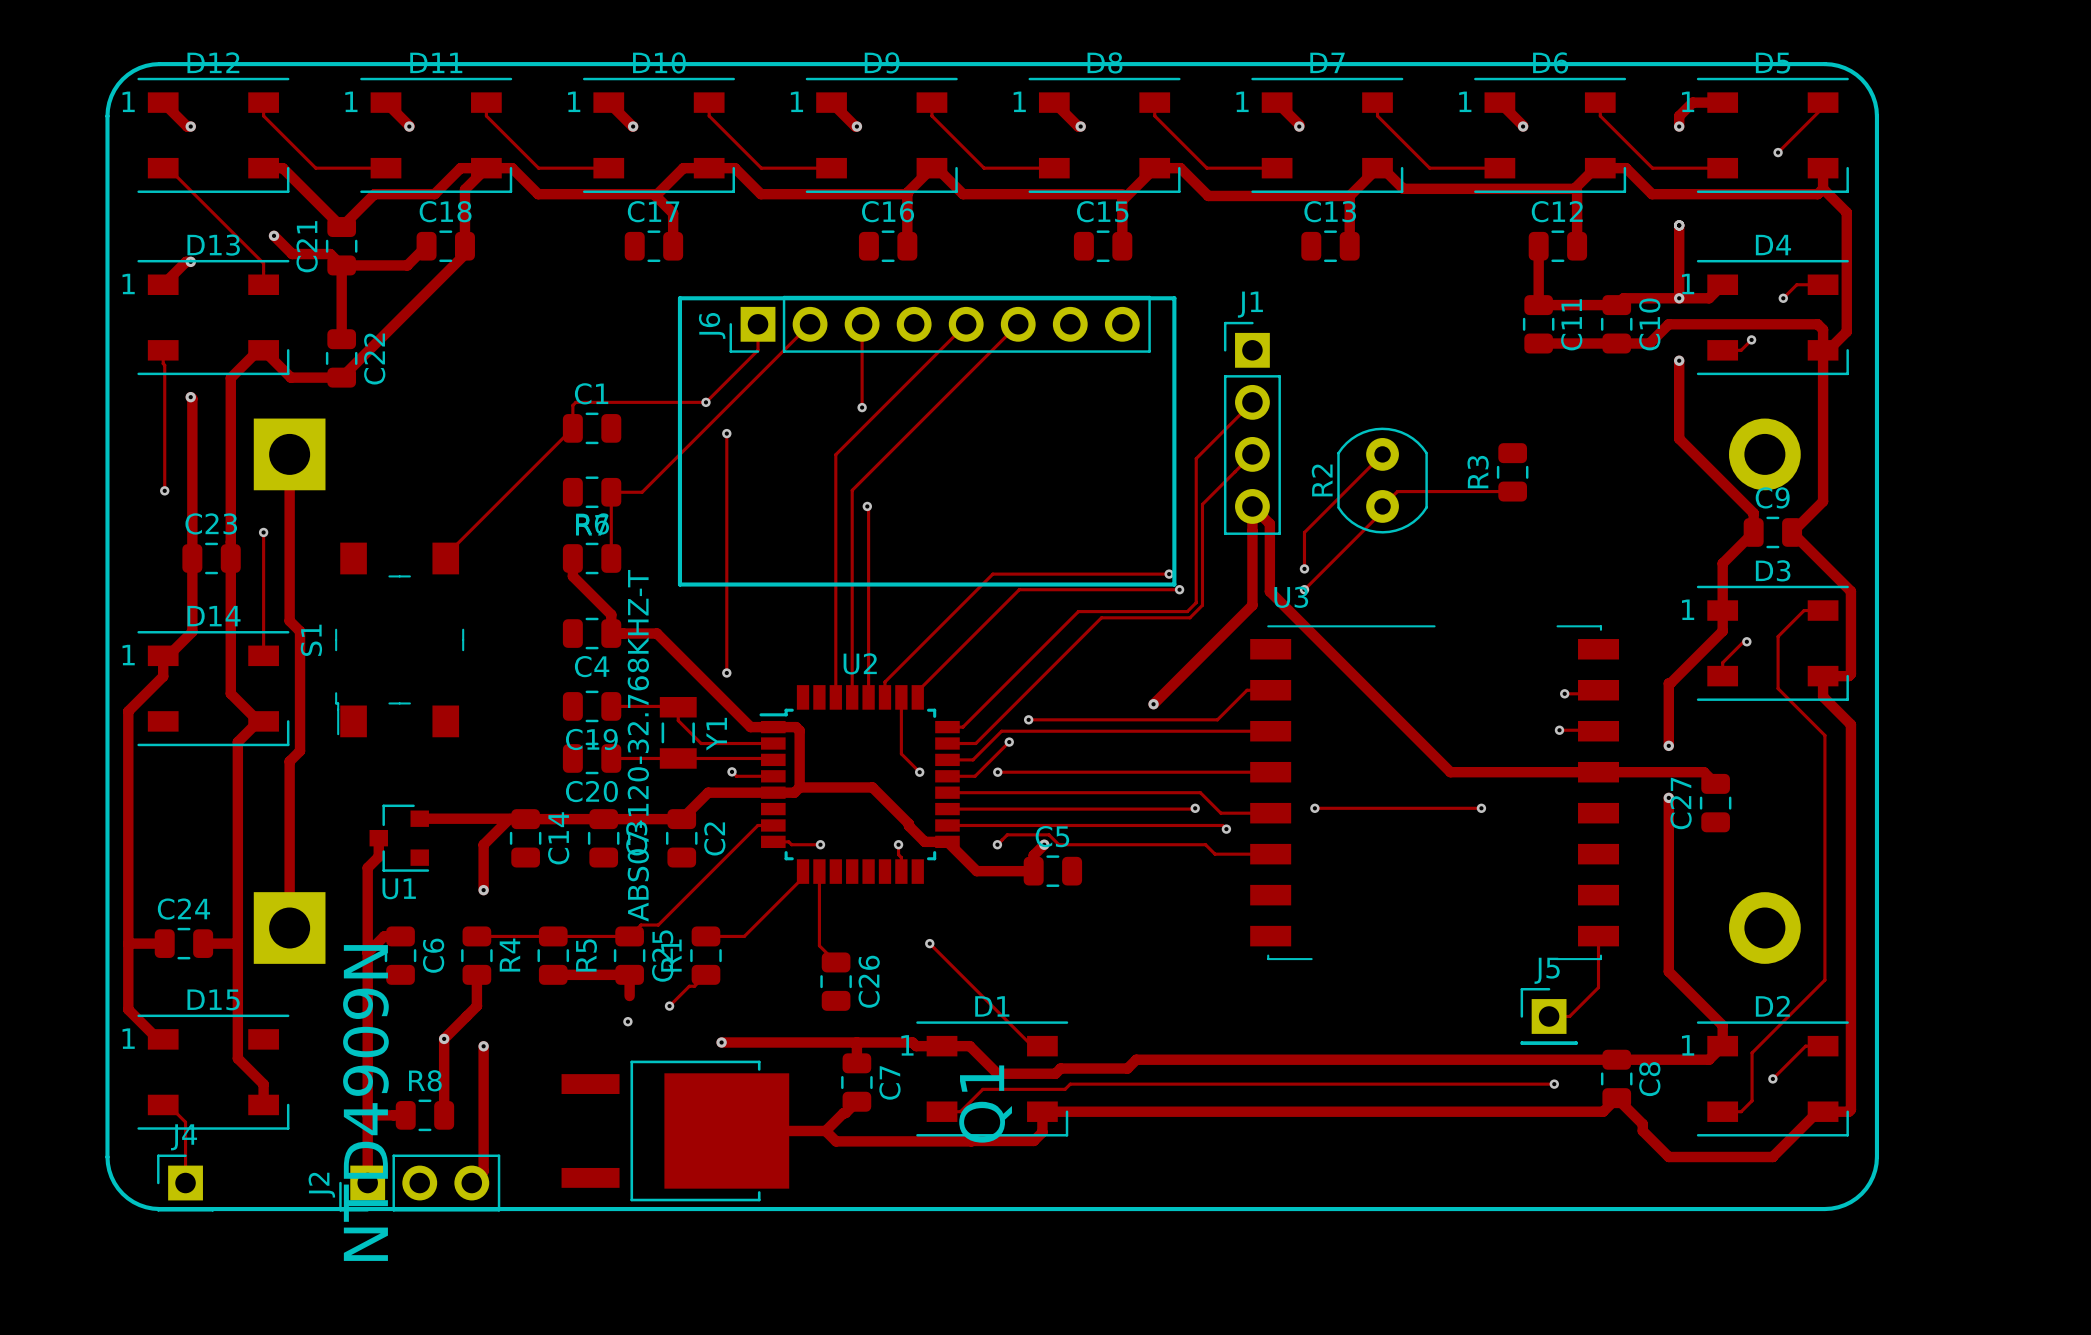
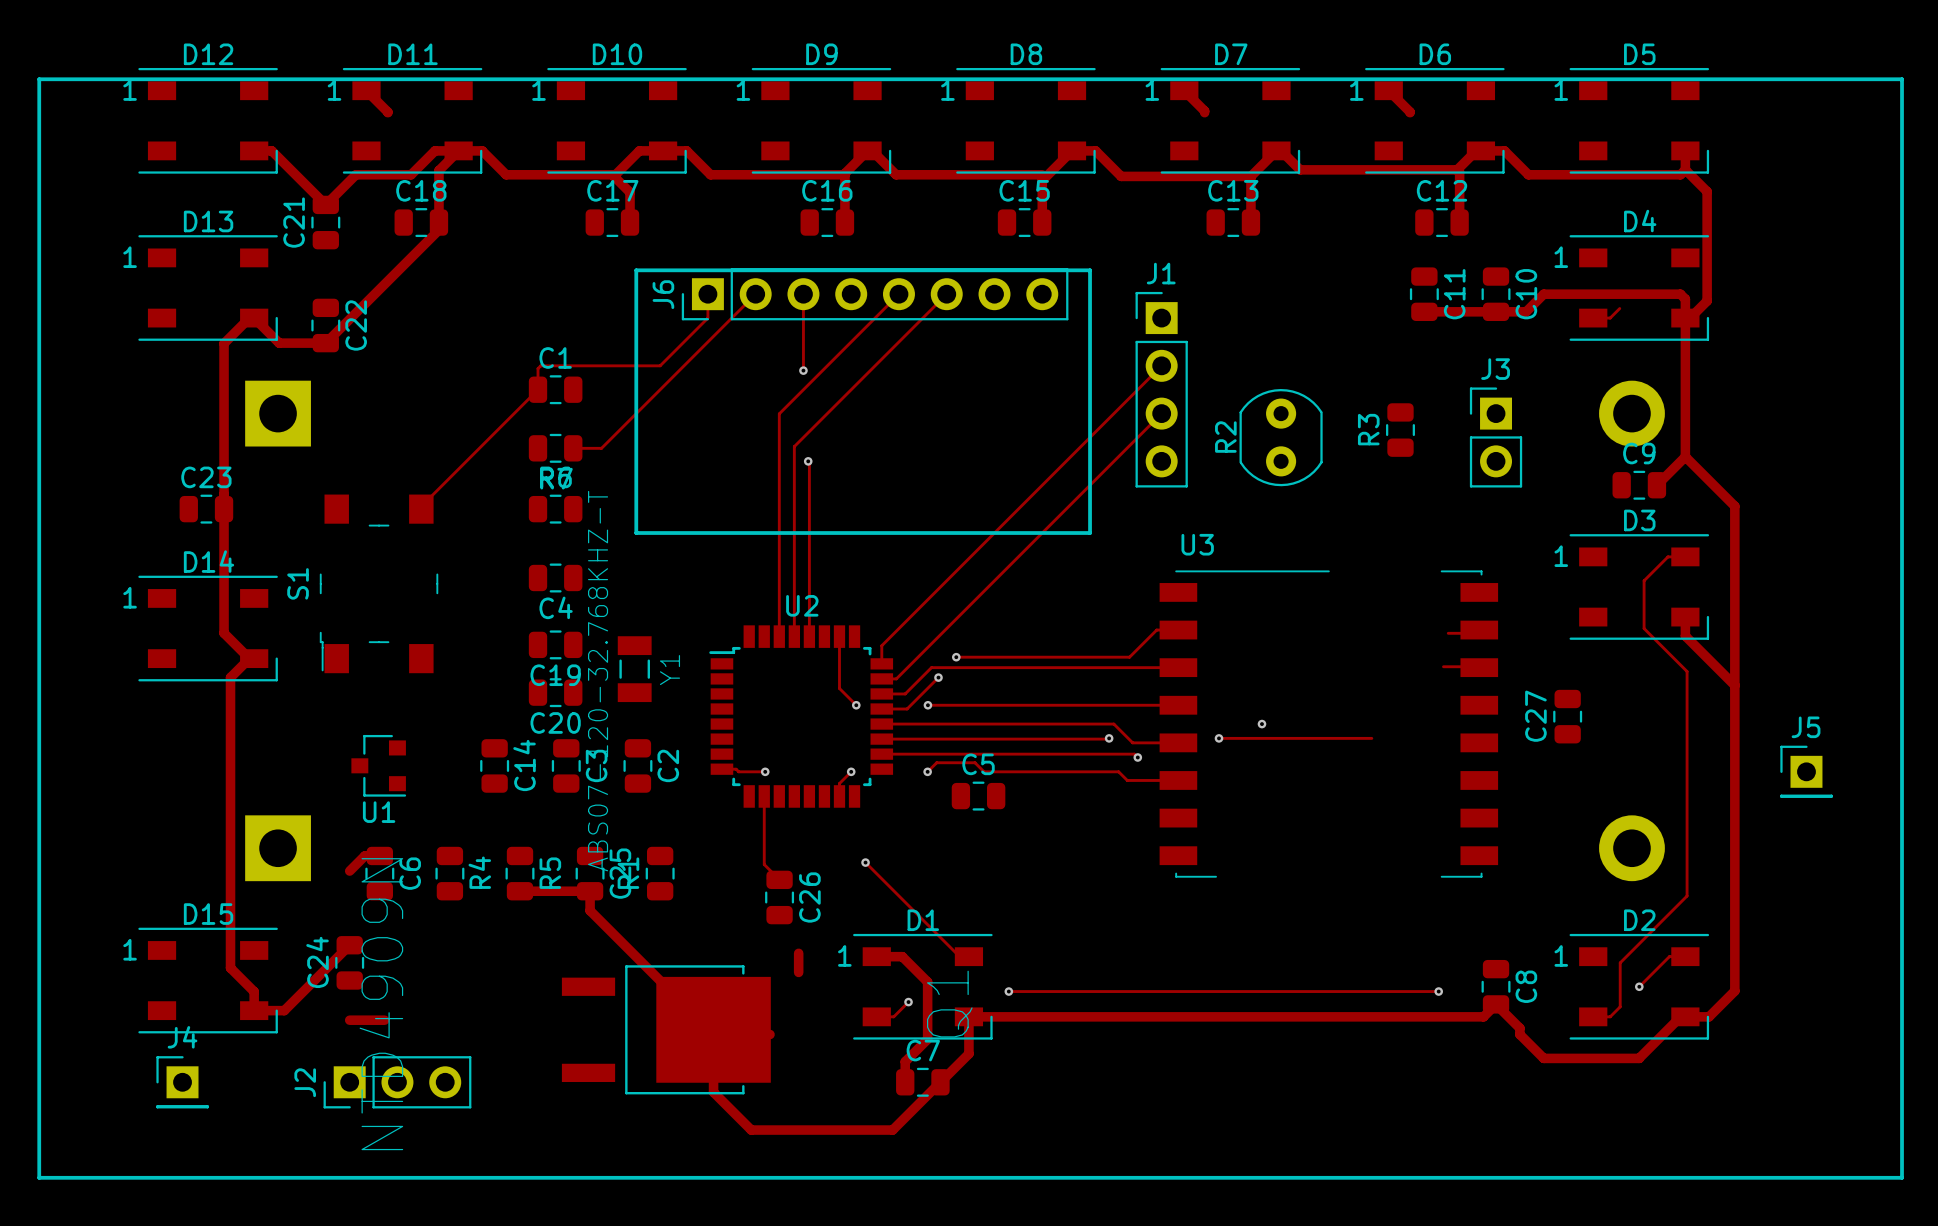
line: (159, 64) (1824, 64) (1838, 65) (1850, 71) (1861, 79) (1869, 90) (1875, 102) (1876, 116) (1876, 1157) (1875, 1170) (1869, 1183) (1861, 1193) (1850, 1202) (1838, 1207) (1824, 1209) (159, 1209) (146, 1207) (133, 1202) (122, 1193) (114, 1183) (109, 1170) (107, 1157) (107, 116) (111, 96) (122, 79) (139, 68) (159, 64) -> (39, 79) (39, 1177) (1902, 1177) (1902, 79) (39, 79)
track: (163, 102) (187, 126) (190, 126) -> none
track: (263, 102) (263, 115) (315, 168) (385, 168) -> none
track: (486, 102) (486, 115) (538, 168) (608, 168) -> none
track: (608, 102) (633, 126) -> none
track: (709, 102) (709, 115) (761, 168) (831, 168) -> none
track: (831, 102) (856, 126) -> none
track: (931, 102) (931, 115) (984, 168) (1054, 168) -> none
track: (1054, 102) (1078, 126) (1080, 126) -> none
track: (1154, 102) (1154, 115) (1206, 168) (1277, 168) -> none
track: (1377, 102) (1377, 115) (1429, 168) (1499, 168) -> none
track: (1600, 102) (1600, 115) (1652, 168) (1722, 168) -> none
track: (1722, 102) (1692, 102) (1679, 116) (1679, 126) -> none
track: (1823, 102) (1823, 107) (1778, 152) -> none
via: (190, 126) -> none
via: (409, 126) -> none
via: (633, 126) -> none
via: (856, 126) -> none
via: (1080, 126) -> none
via: (1299, 126) -> none
via: (1523, 126) -> none
via: (1679, 126) -> none
via: (1778, 152) -> none
track: (163, 168) (168, 168) (263, 263) (263, 284) -> none
track: (1679, 225) (1679, 298) -> none
via: (1679, 225) -> none
track: (274, 235) (292, 254) (330, 254) (341, 265) -> none
via: (274, 235) -> none
track: (426, 246) (407, 265) (341, 265) -> none
track: (1538, 246) (1538, 305) (1616, 305) (1623, 298) (1709, 298) (1722, 284) -> none
track: (190, 261) (186, 261) (163, 284) -> none
via: (190, 261) -> none
track: (341, 265) (341, 339) -> none
track: (1823, 284) (1796, 284) (1783, 298) -> none
via: (1679, 298) -> none
via: (1783, 298) -> none
via: (1751, 339) -> none
track: (163, 350) (164, 490) -> none
track: (1679, 360) (1679, 438) (1753, 513) (1753, 532) (1722, 563) (1722, 631) (1668, 683) (1668, 745) -> none
via: (1679, 360) -> none
track: (190, 397) (192, 398) (192, 631) (168, 655) (163, 655) (163, 676) (128, 711) (128, 1009) (158, 1039) (163, 1039) -> none
via: (190, 397) -> none
via: (705, 402) -> none
track: (726, 433) (726, 672) -> none
via: (726, 433) -> none
track: (289, 454) (289, 620) (300, 631) (300, 751) (289, 761) (289, 928) -> none
track: (1382, 454) (1304, 532) (1304, 568) -> none
track: (1196, 458) (1196, 602) (1187, 611) (1078, 611) (962, 727) (947, 727) -> (1110, 417) (881, 645) (881, 663)
J3: none -> (1496, 437)
via: (164, 490) -> none
track: (1512, 491) (1397, 491) (1382, 506) (1382, 511) (1304, 589) -> none
track: (611, 492) (611, 558) -> none
track: (1202, 504) (1202, 605) (1189, 617) (1101, 617) (975, 743) (963, 743) -> (1115, 459) (896, 678)
track: (263, 532) (263, 655) -> none
via: (263, 532) -> none
track: (1792, 532) (1850, 591) (1850, 674) (1848, 676) (1823, 676) -> none
track: (572, 558) (572, 576) (611, 614) (611, 633) (657, 633) (750, 727) (796, 727) (799, 730) (799, 787) -> none
via: (1304, 568) -> none
track: (1169, 574) (992, 574) (884, 681) (884, 697) -> none
via: (1169, 574) -> none
track: (1179, 589) (1019, 589) (917, 691) (917, 697) -> none
via: (1179, 589) -> none
via: (1304, 589) -> none
track: (1746, 641) (1743, 641) (1722, 662) (1722, 676) -> none
via: (1746, 641) -> none
via: (726, 672) -> none
via: (1564, 693) -> none
track: (1153, 704) (1252, 605) (1252, 506) (1269, 523) (1269, 591) (1450, 772) (1703, 772) (1715, 783) -> none
via: (1153, 704) -> none
track: (611, 706) (677, 706) (678, 720) (701, 743) (773, 743) -> none
track: (1850, 724) (1850, 1109) -> (1685, 456) (1734, 506) (1734, 991) (1710, 1014)
track: none -> (1710, 661) (1734, 685)
via: (1559, 730) -> none
via: (1668, 745) -> none
track: (611, 758) (773, 759) -> none
track: (732, 771) (736, 776) (773, 776) -> none
via: (732, 771) -> none
track: (799, 787) (794, 792) (708, 792) (681, 819) (509, 819) (483, 844) (483, 890) -> none
track: (799, 787) (872, 787) (924, 841) (947, 841) (976, 871) (1033, 871) (1033, 855) (1044, 844) -> none
via: none -> (1261, 724)
track: (1668, 797) (1668, 971) (1722, 1025) (1722, 1046) -> none
via: (1668, 797) -> none
C27 position: (1715, 803) -> (1567, 716)
via: (1481, 808) -> none
track: (419, 818) (525, 819) -> none
track: (773, 825) (757, 825) (658, 925) (641, 925) (629, 936) (476, 936) -> none
track: (378, 838) (378, 856) (367, 867) (367, 1183) -> none
track: (898, 844) (898, 854) (901, 857) -> (851, 771) (839, 783)
via position: (898, 844) -> (851, 771)
via: (1044, 844) -> none
track: (803, 871) (803, 877) (744, 936) (705, 936) -> none
via: (483, 890) -> none
C24 name position: C24 (183, 909) -> C24 (317, 962)
track: (1598, 936) (1598, 987) (1569, 1016) (1549, 1016) -> none
track: (128, 943) (164, 943) -> none
C24 rotation: 0° (183, 943) -> 90° clockwise (349, 962)
C24 position: (183, 943) -> (349, 962)
track: (203, 943) (237, 943) -> none
track: (476, 974) (476, 1005) (444, 1038) (444, 1115) -> none
track: (705, 974) (694, 986) (689, 986) (669, 1006) -> none
track: none -> (590, 910) (709, 1029)
via: (669, 1006) -> none
J5 position: (1549, 1016) -> (1806, 771)
via: (627, 1021) -> none
track: none -> (349, 945) (284, 1010) (254, 1010)
via: (444, 1038) -> none
track: (721, 1042) (912, 1042) (916, 1046) (942, 1046) -> none
via: (721, 1042) -> none
track: (483, 1046) (483, 1171) (471, 1183) -> none
via: (483, 1046) -> none
track: (1722, 1046) (1709, 1059) (1136, 1059) (1127, 1068) (1060, 1068) (1055, 1073) (997, 1073) -> (905, 1082) (905, 1061) (927, 1039) (927, 981)
C7 rotation: 0° (856, 1082) -> 90° clockwise (922, 1082)
C7 position: (856, 1082) -> (922, 1082)
C7 name position: C7 (889, 1082) -> C7 (923, 1050)
track: (1085, 1084) (1070, 1084) (1065, 1089) (982, 1089) (976, 1095) -> none
via: none -> (1008, 991)
via: none -> (908, 1002)
track: (856, 1101) (825, 1130) (836, 1141) (1033, 1140) (1042, 1132) -> (713, 1029) (713, 1092) (751, 1130) (892, 1130) (968, 1053) (968, 1035)
track: (163, 1104) (168, 1104) (185, 1122) (185, 1183) -> none
R8: (424, 1115) -> none
Q1 position: (675, 1130) -> (666, 1029)

